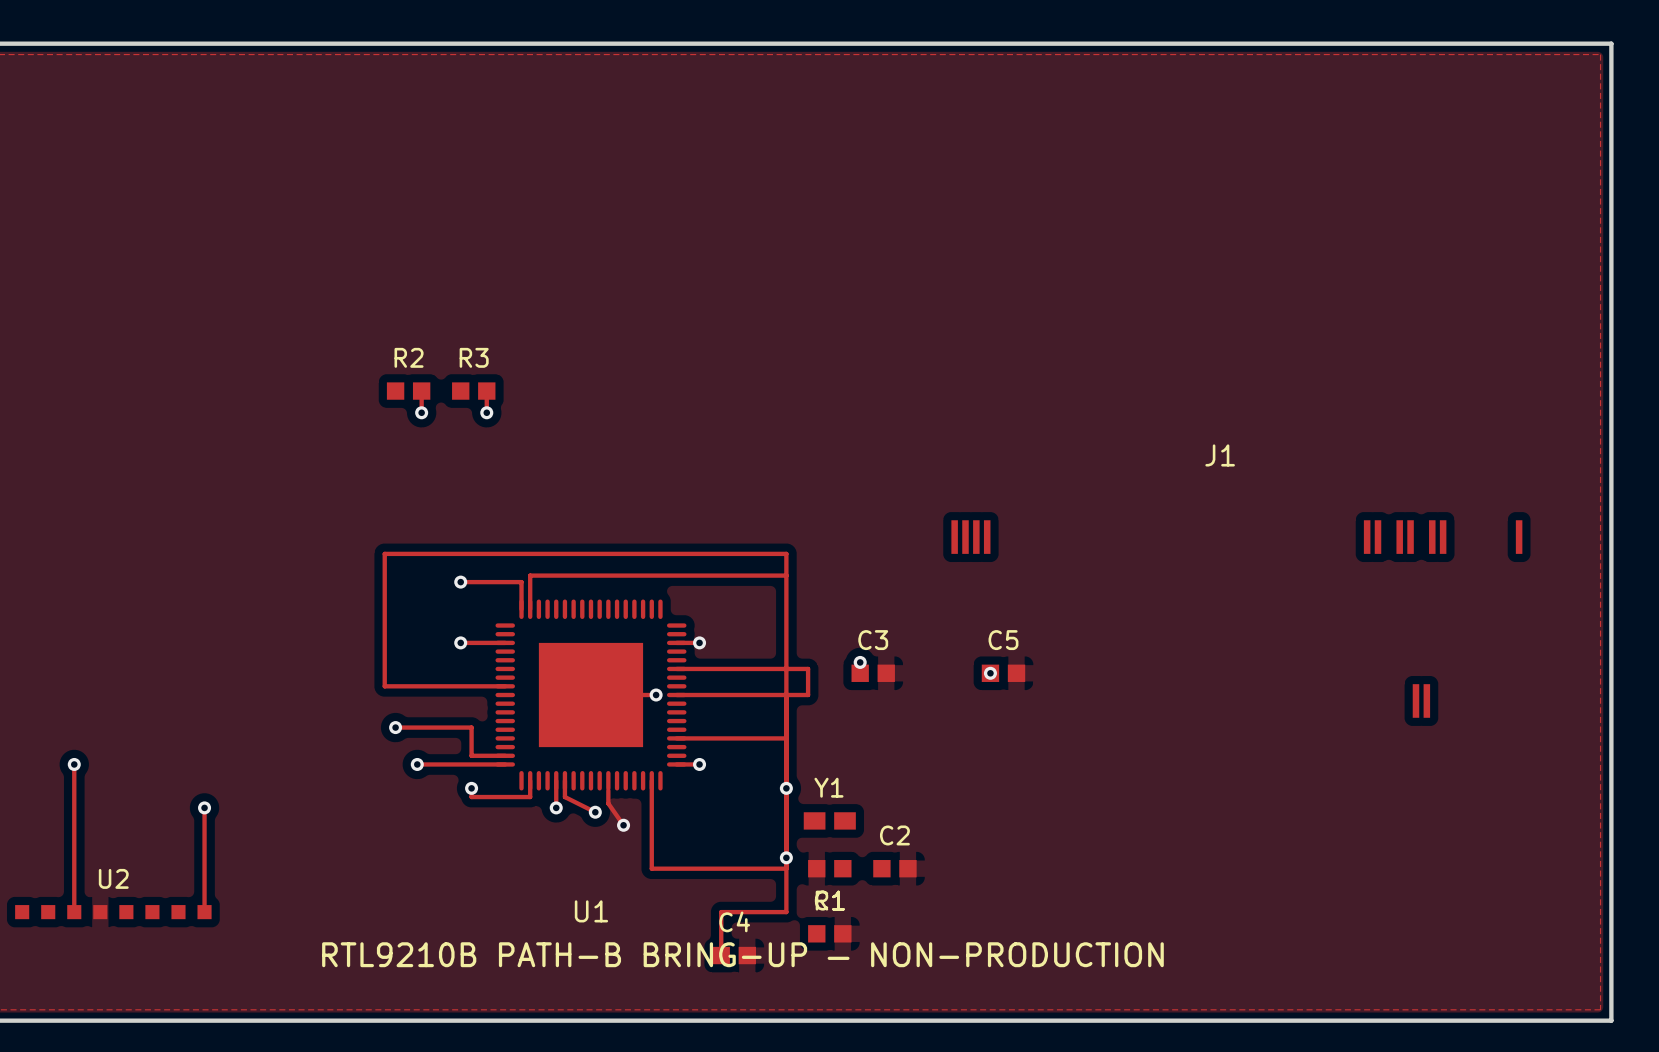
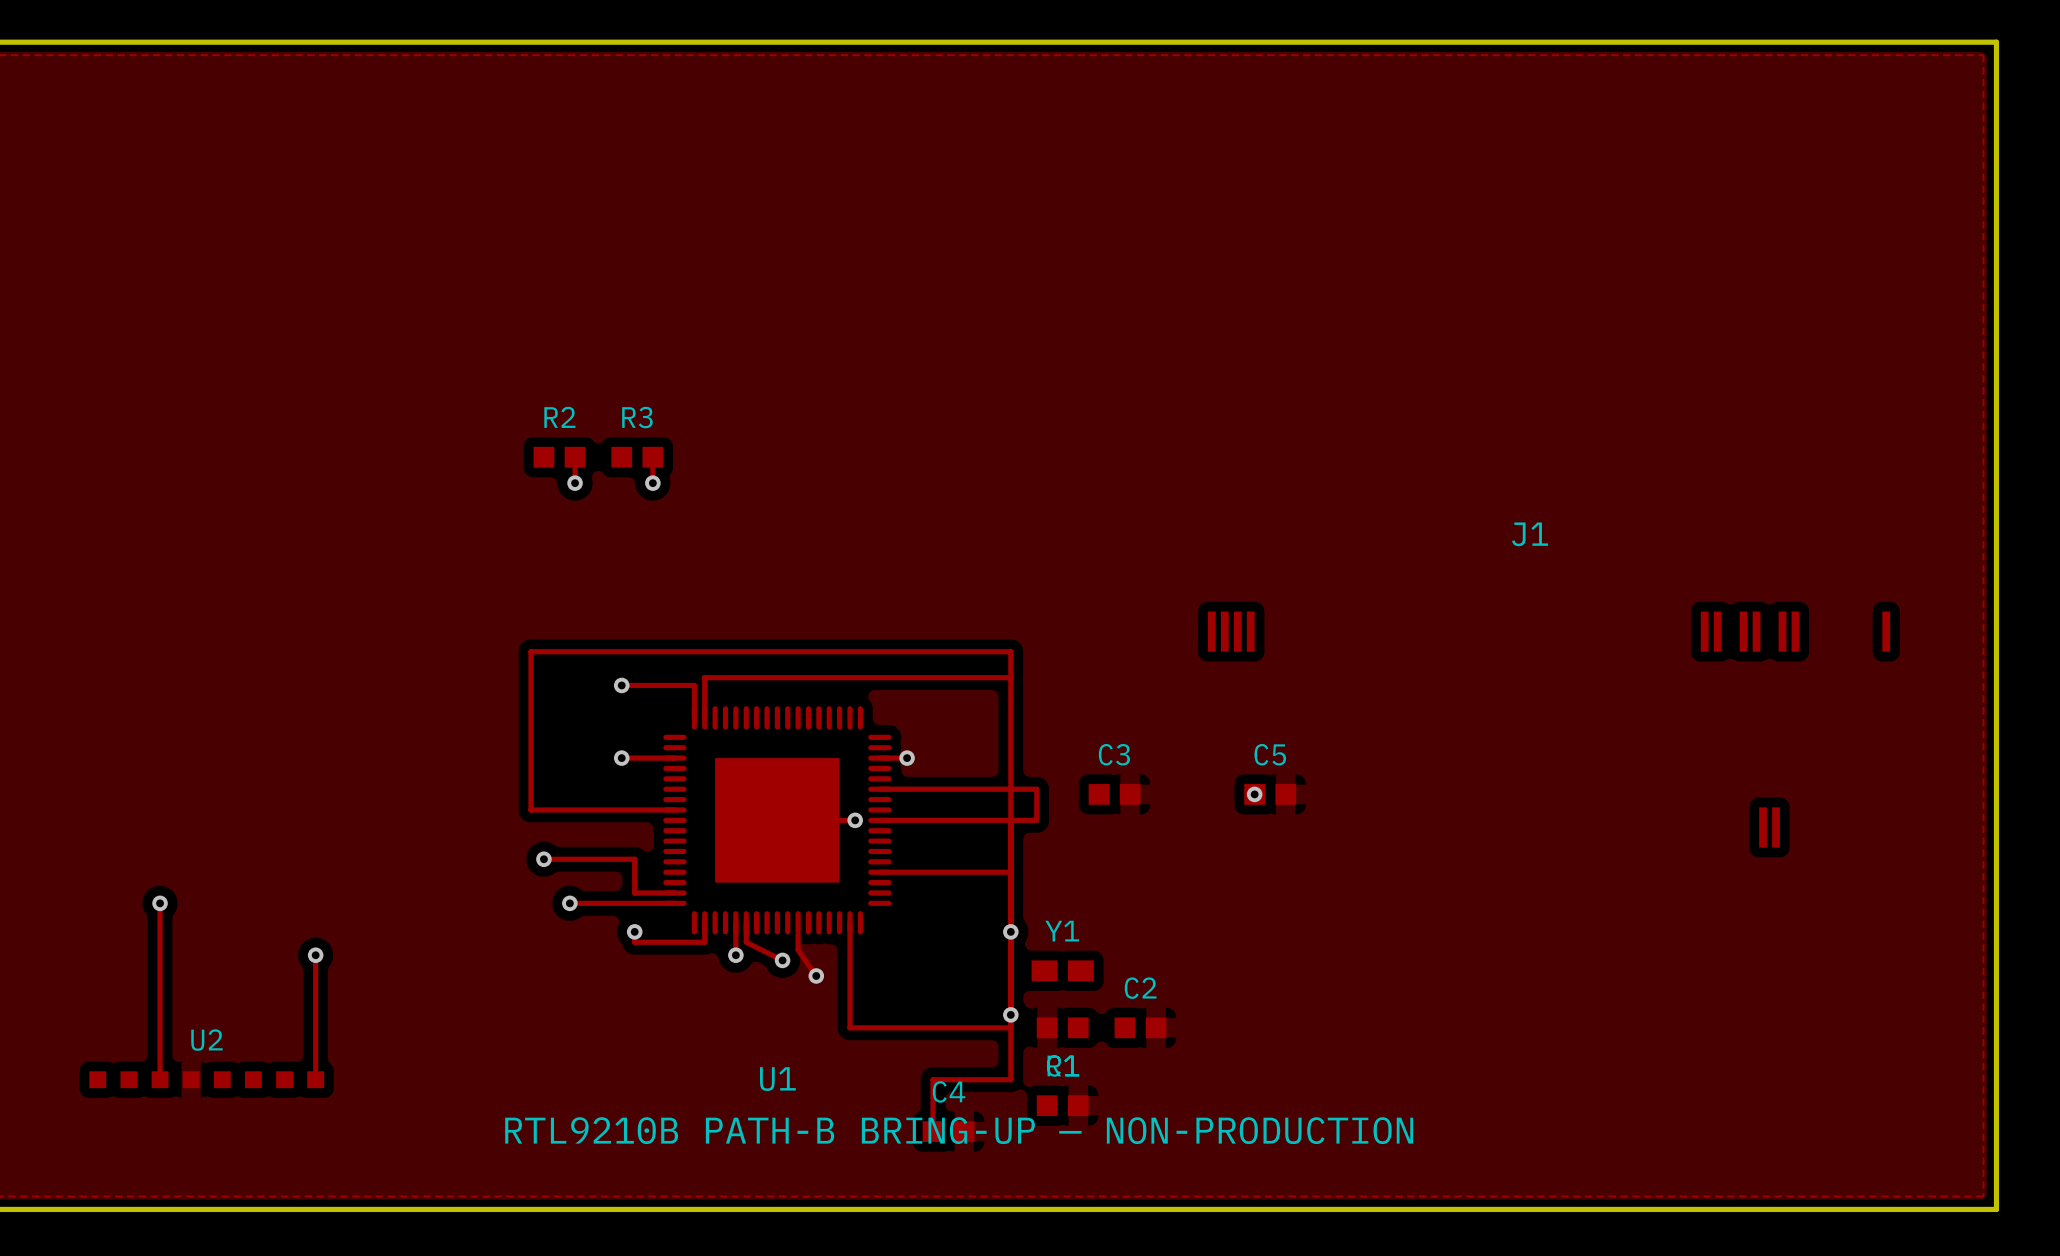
via: (860, 662) -> none
track: (676, 764) (699, 764) -> none
via: (699, 764) -> none

